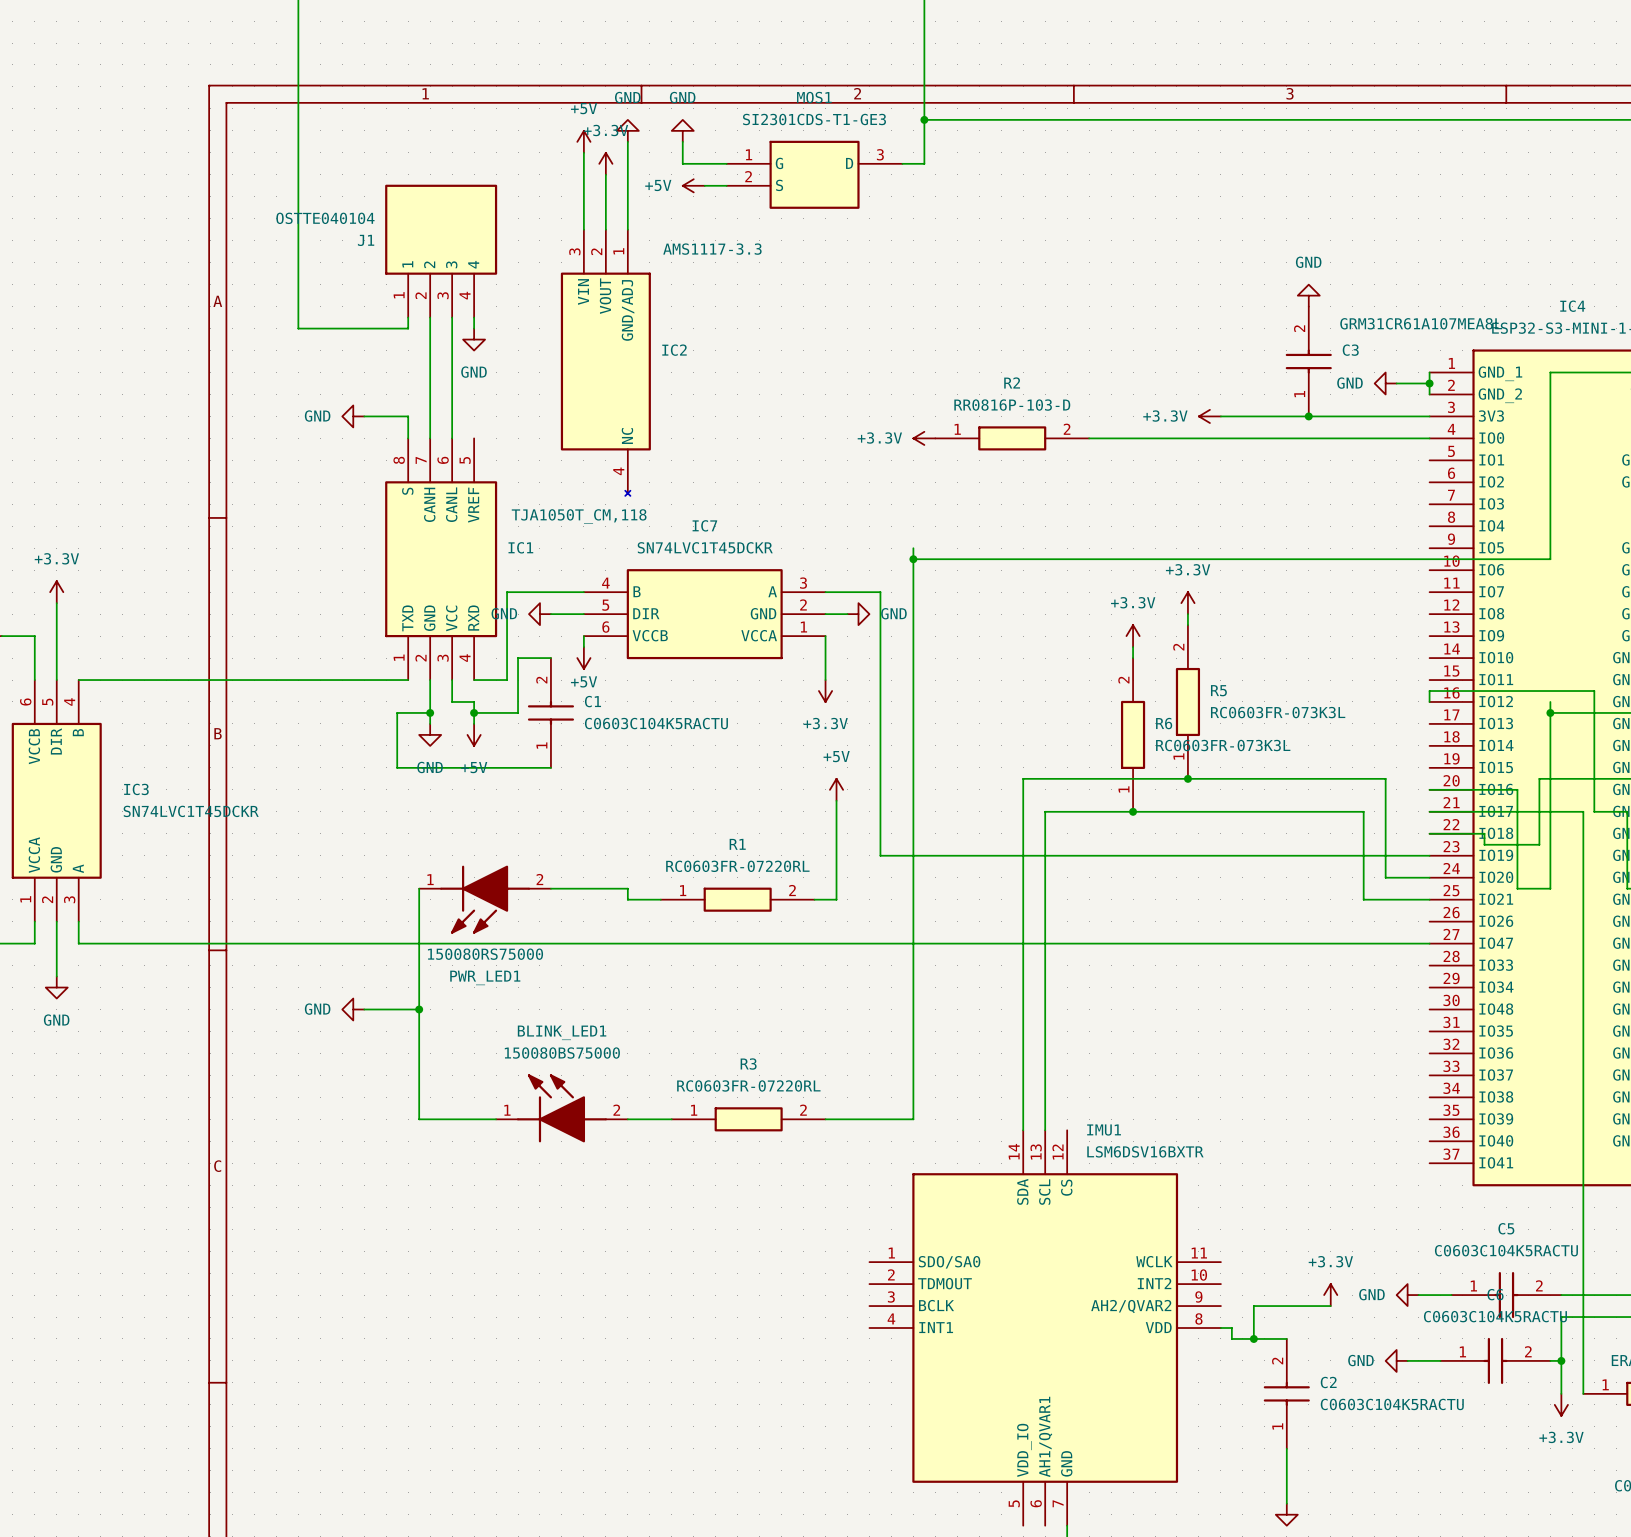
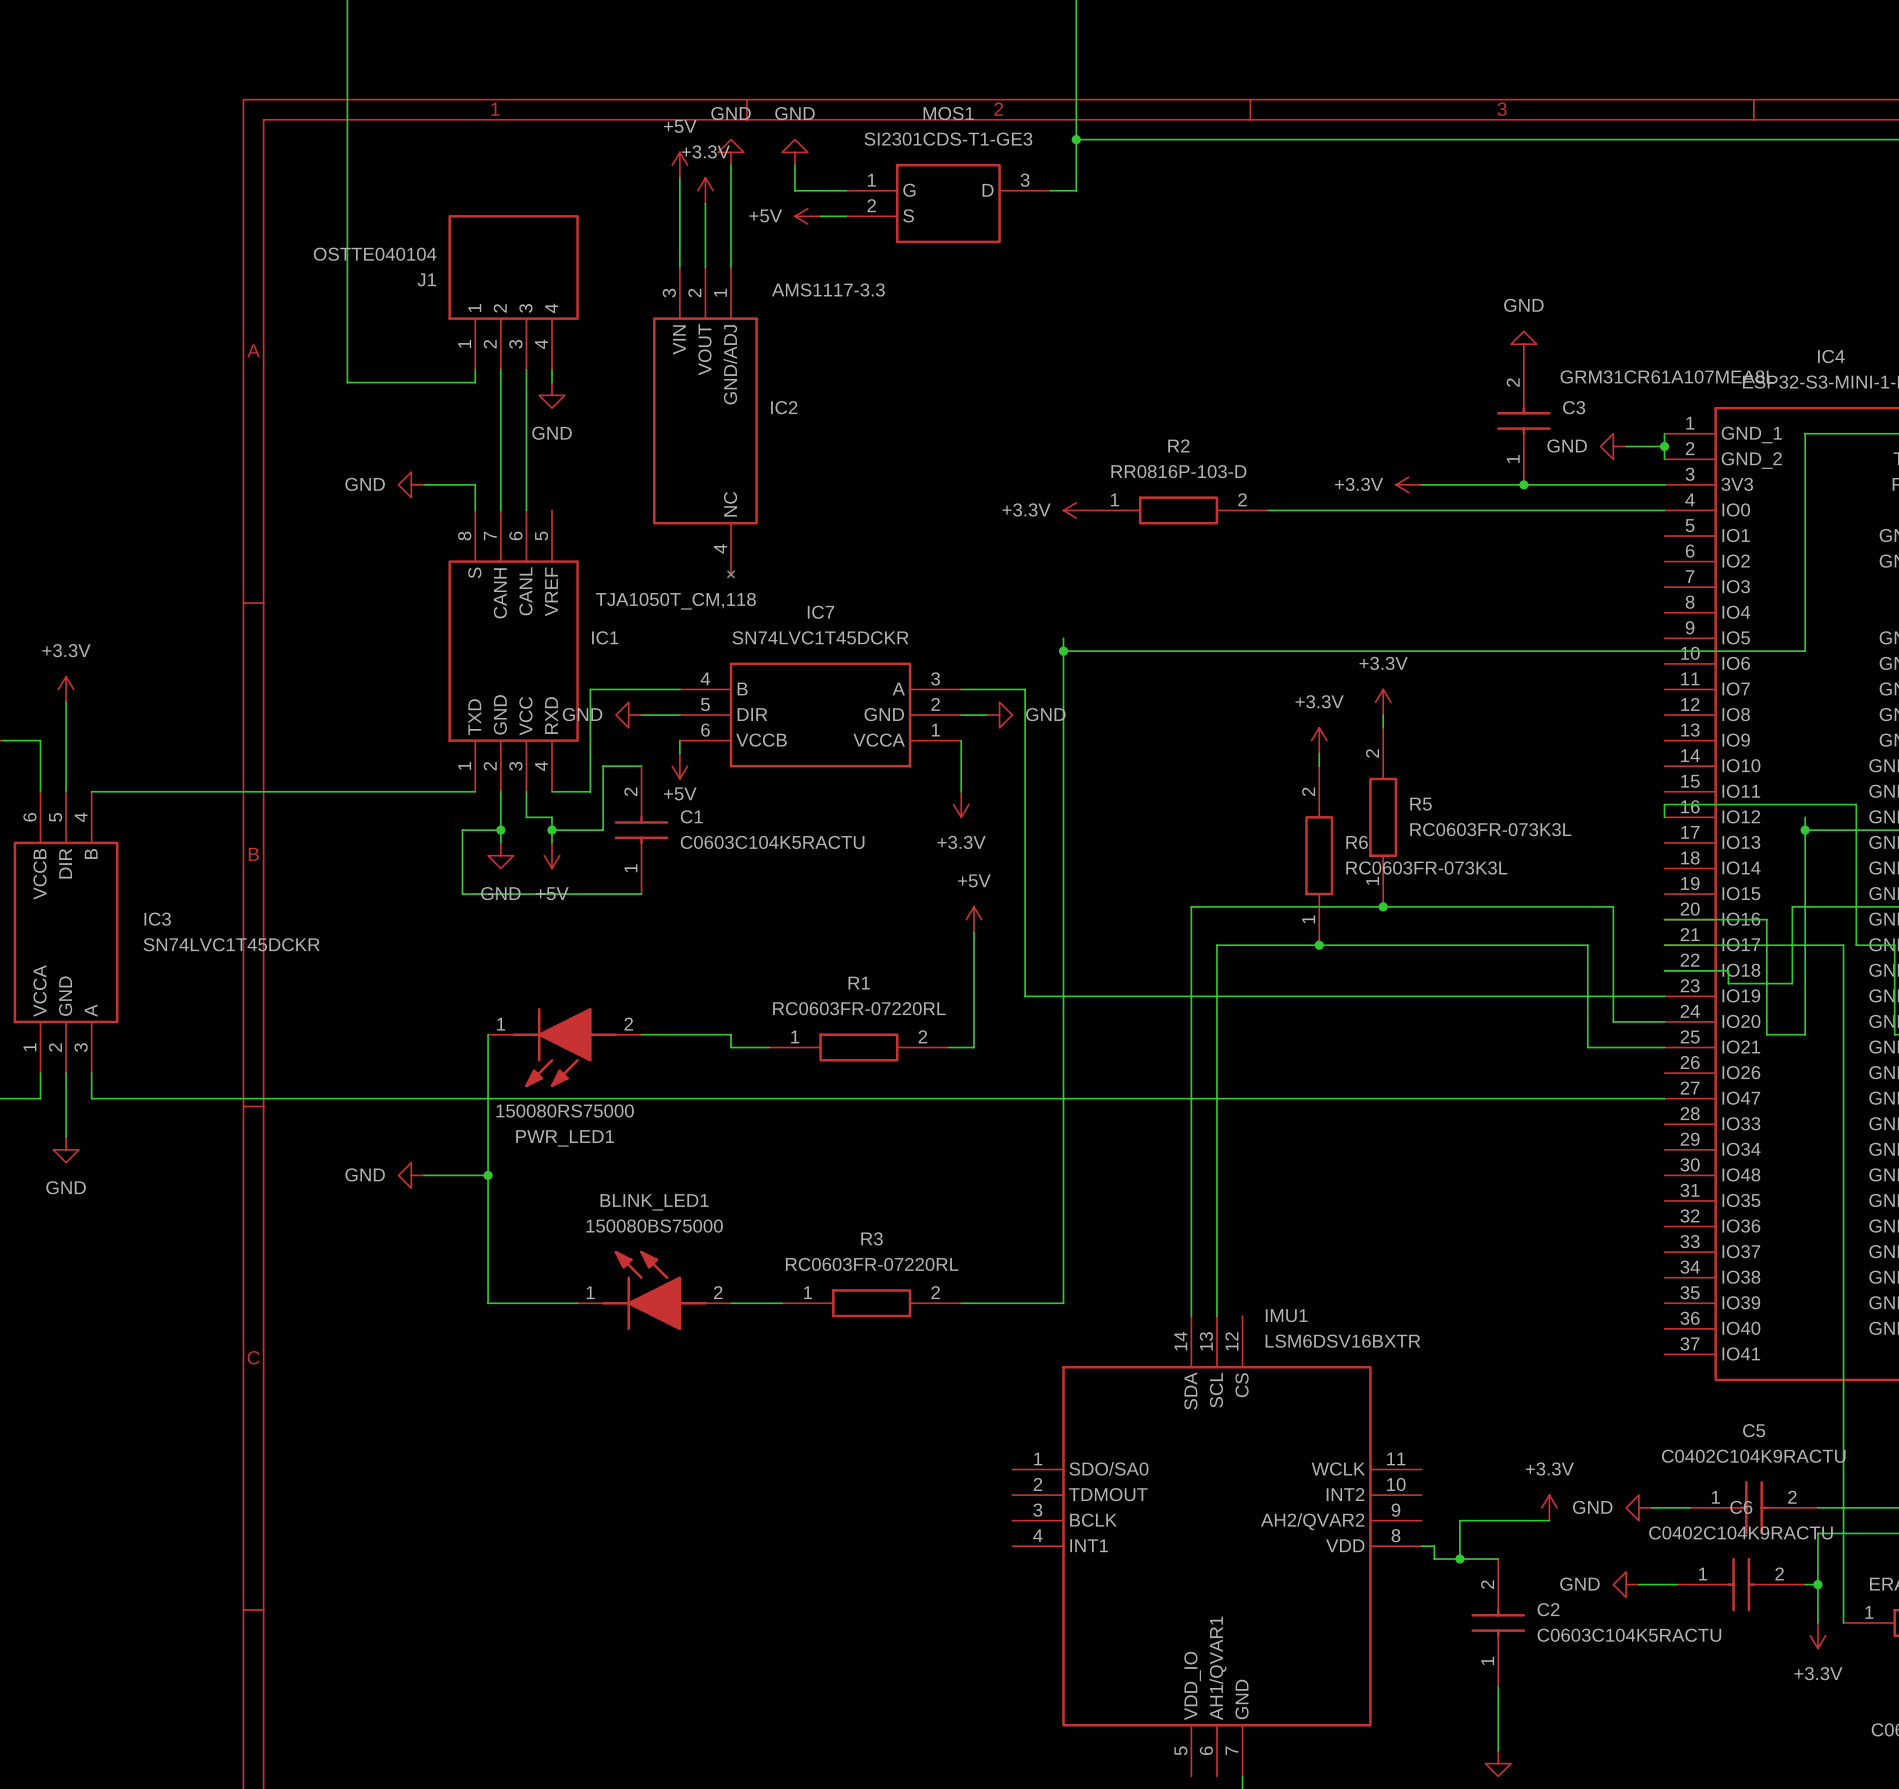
C5 value: C0603C104K5RACTU (1506, 1250) -> C0402C104K9RACTU (1753, 1456)
C6 value: C0603C104K5RACTU (1495, 1316) -> C0402C104K9RACTU (1740, 1532)

